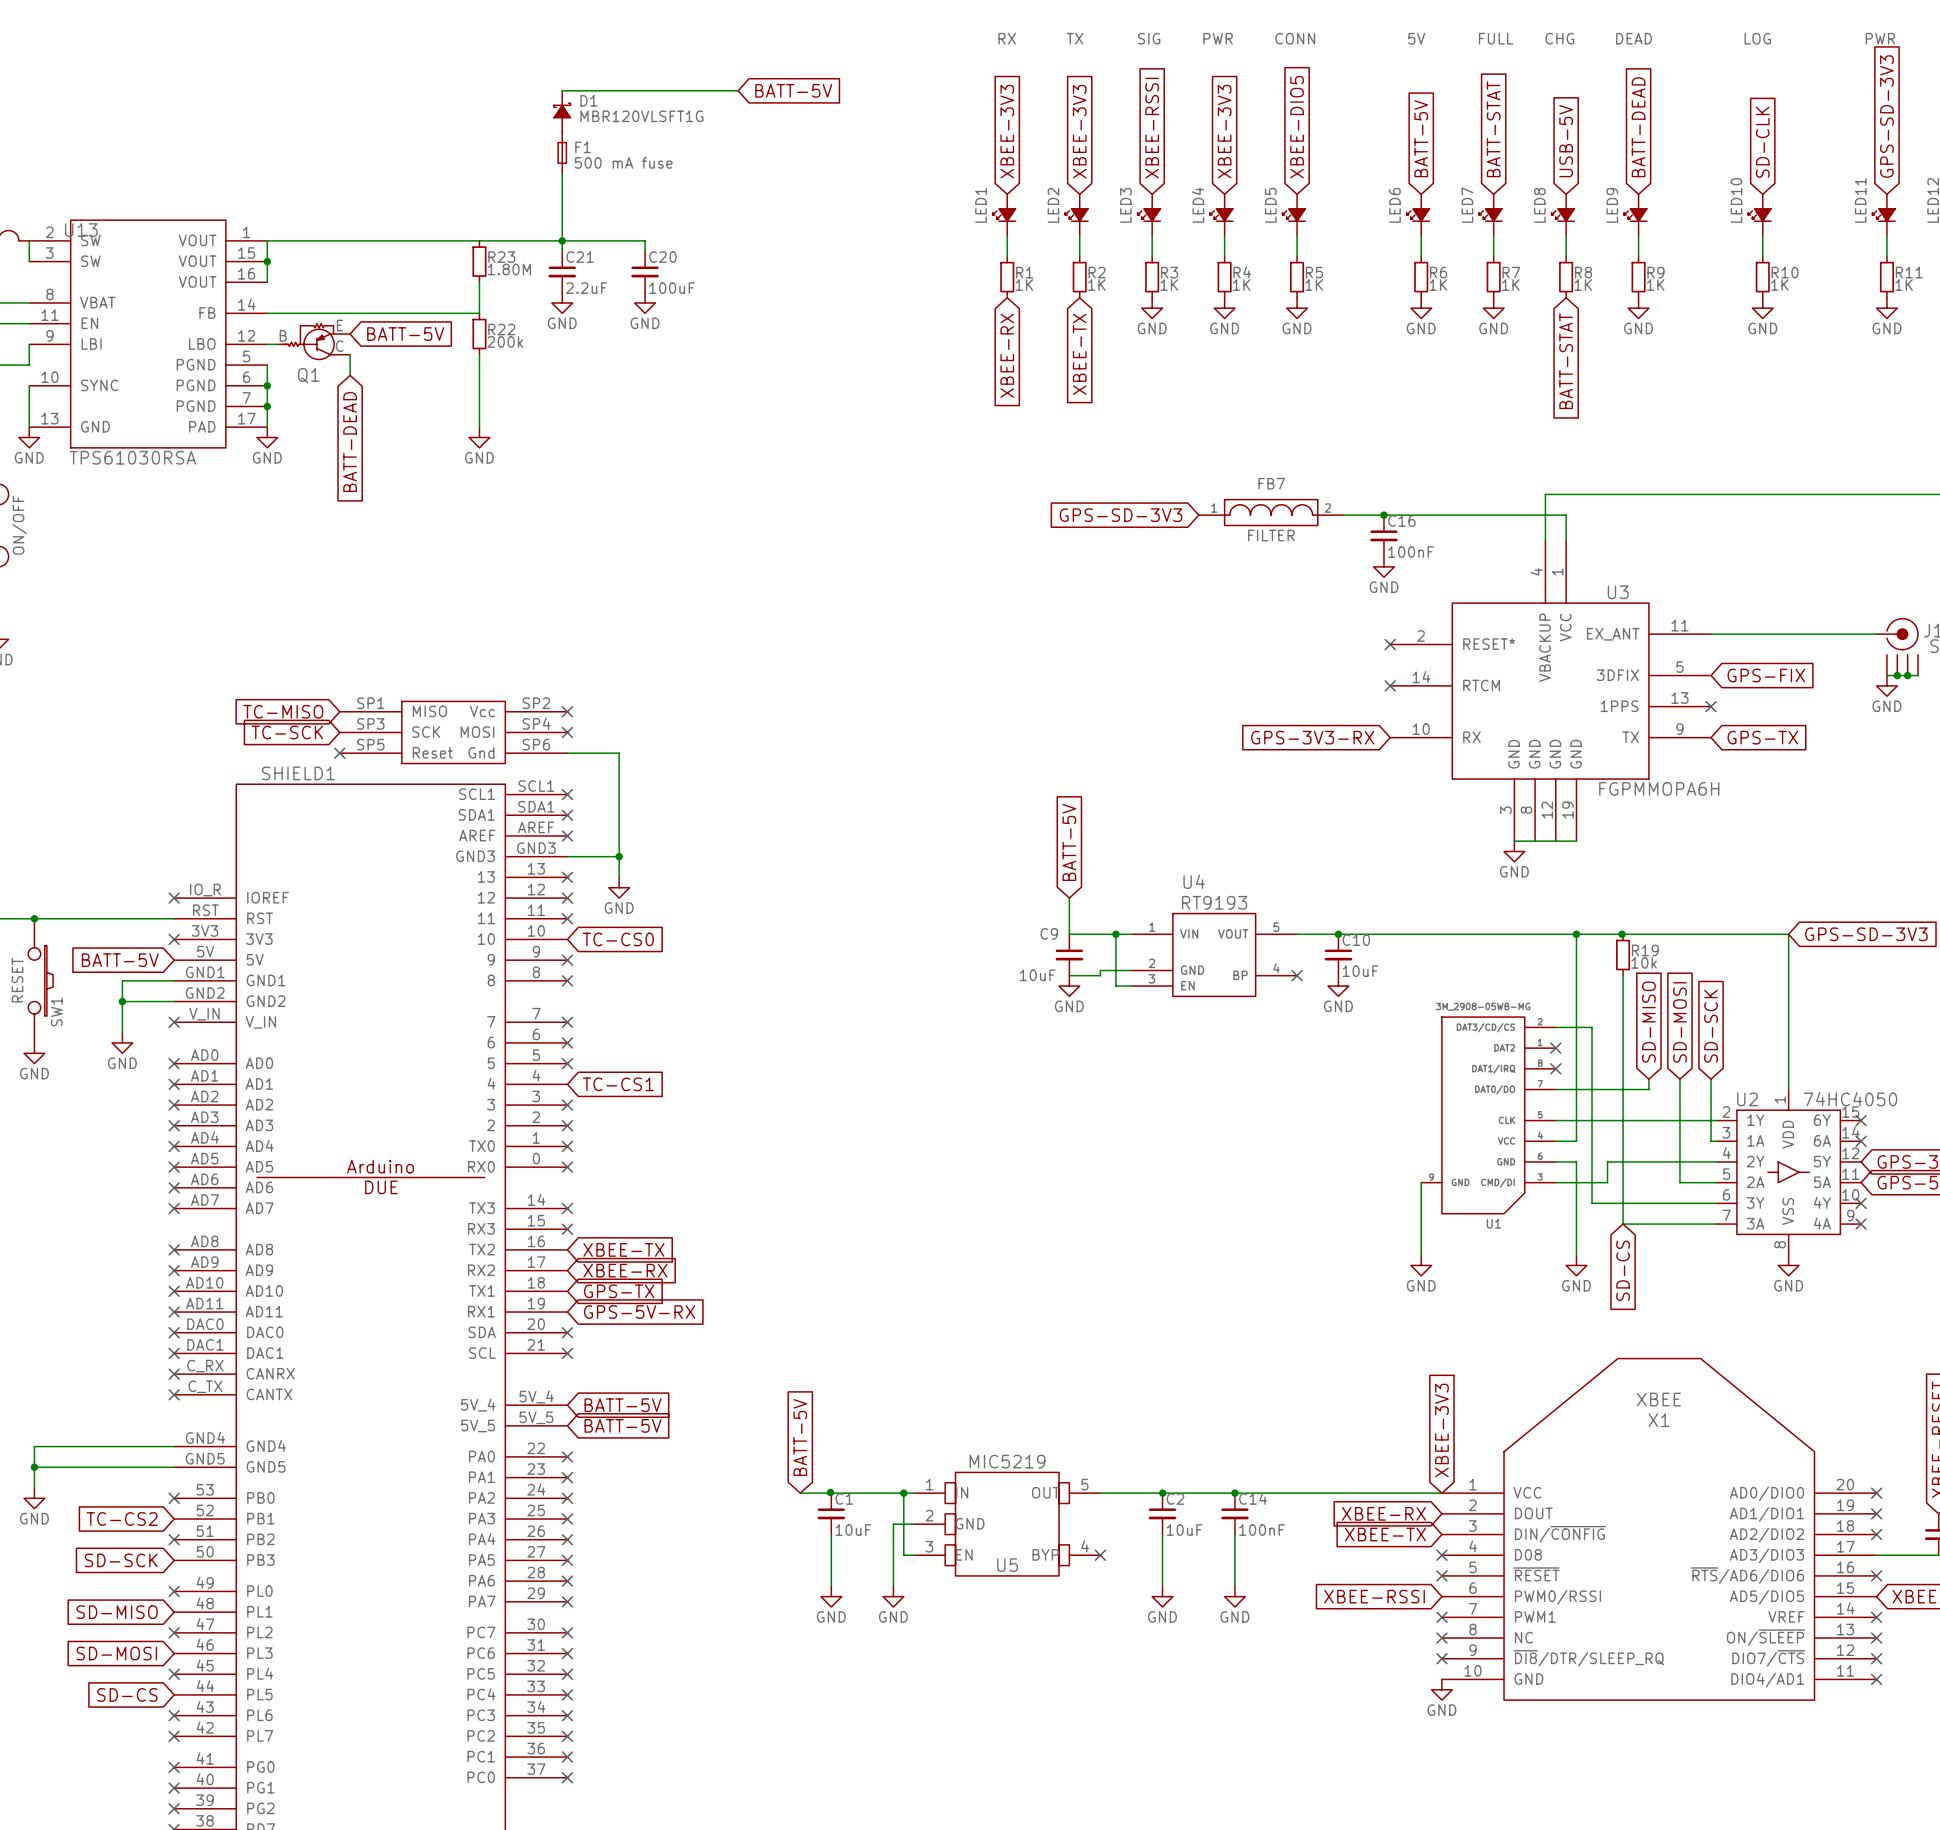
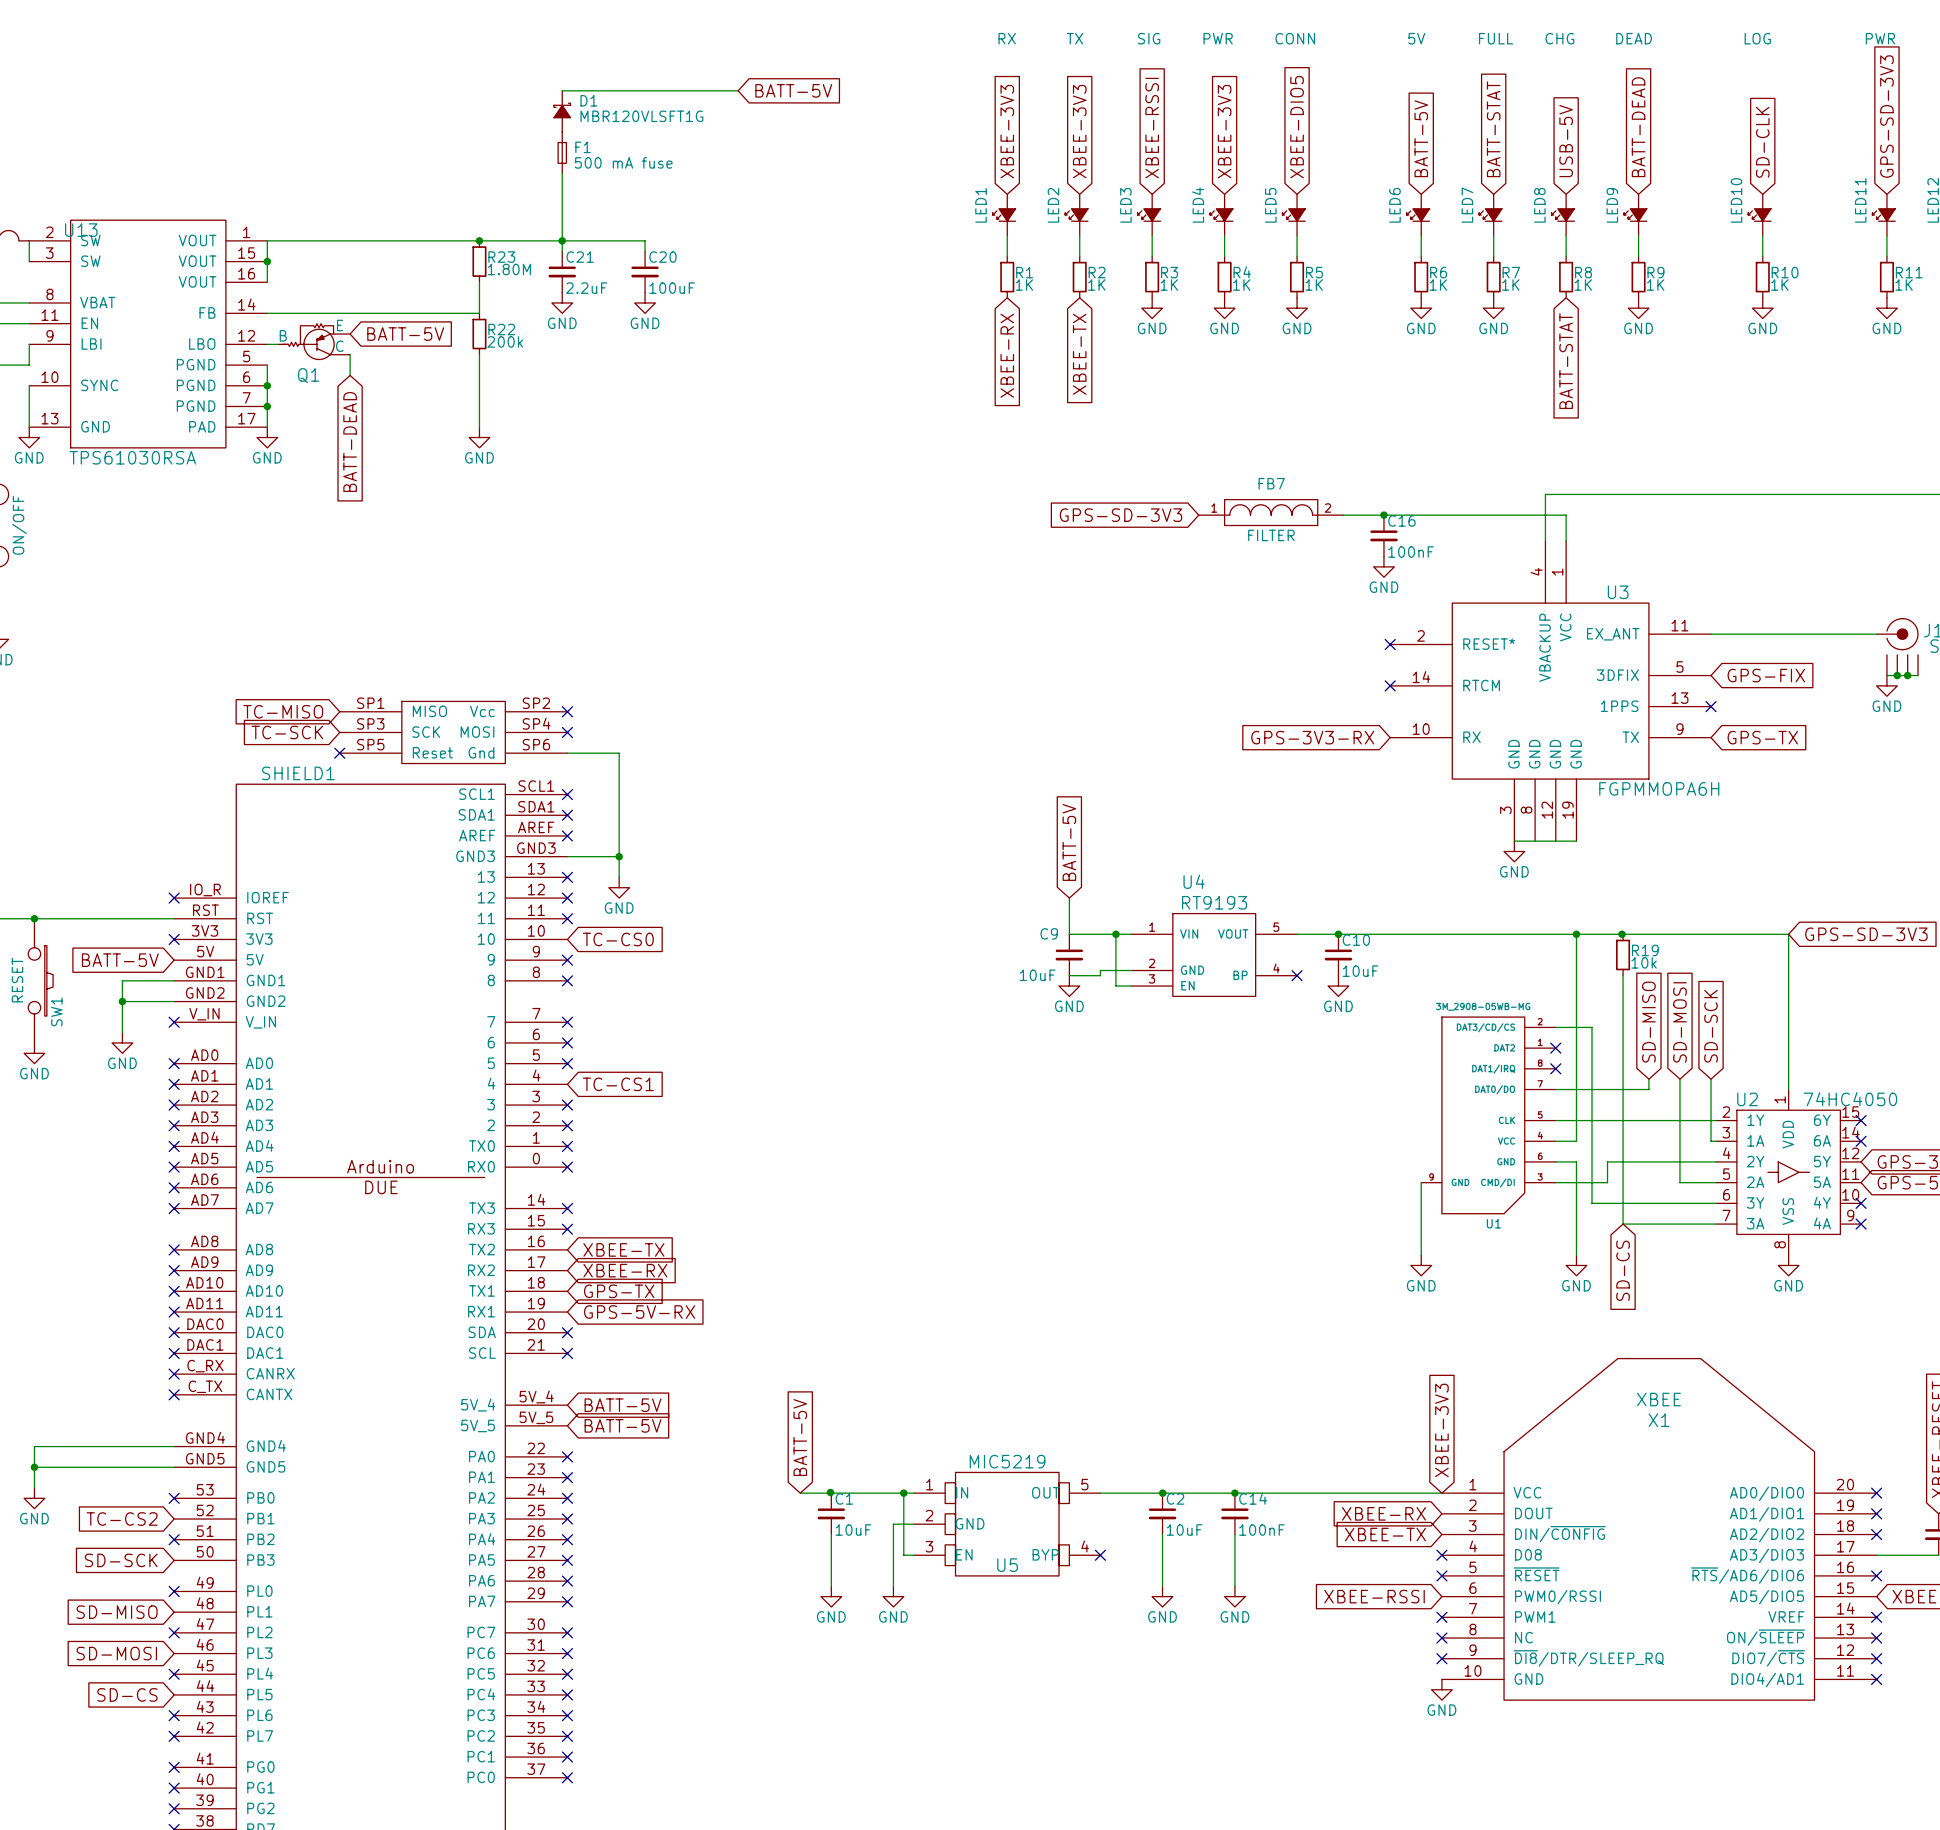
junction: none -> (479, 240)

